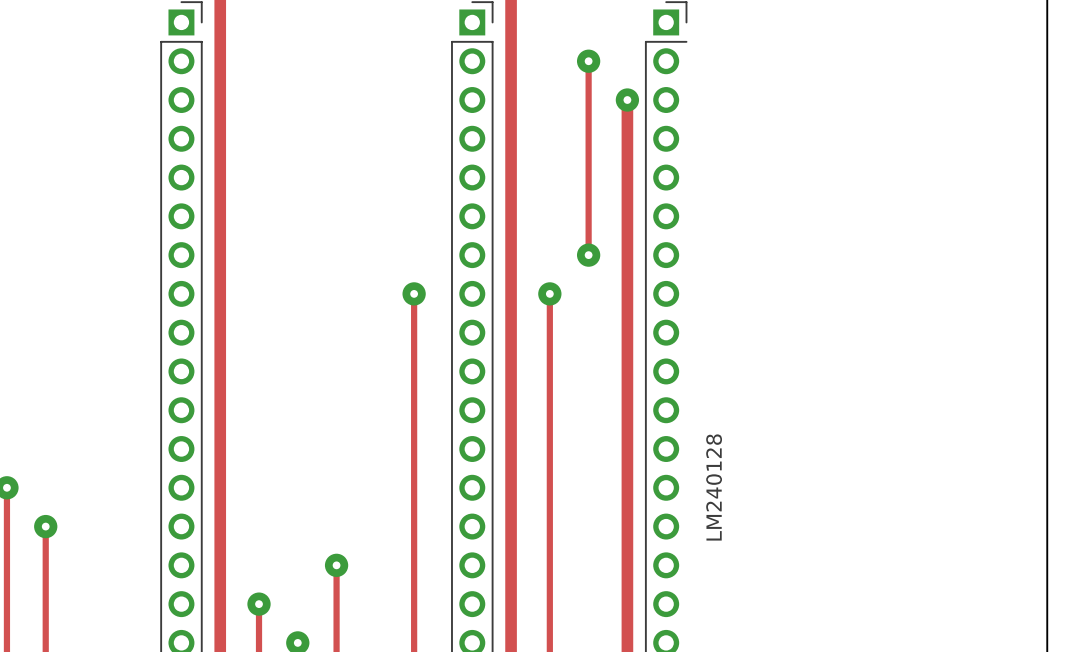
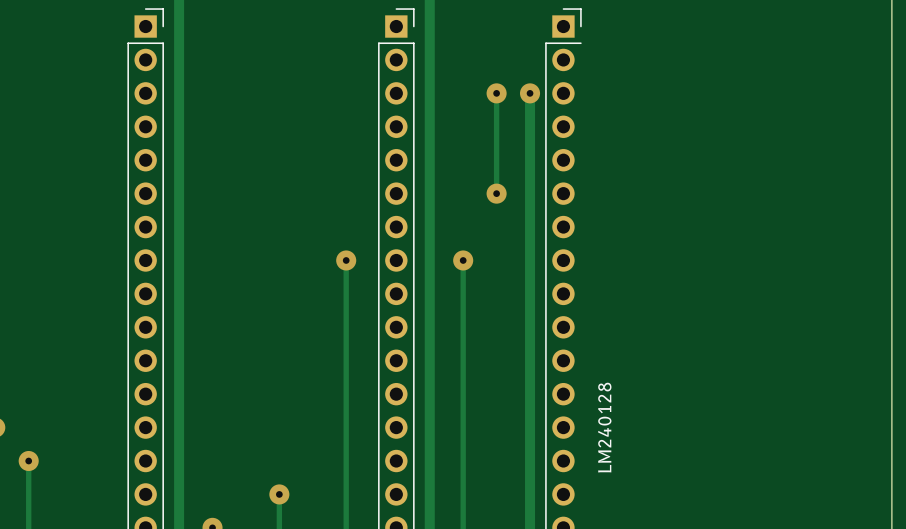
track: (588, 61) (588, 100) -> none
via position: (588, 61) -> (496, 93)
track: (588, 216) (588, 255) -> none
via position: (588, 255) -> (496, 193)

